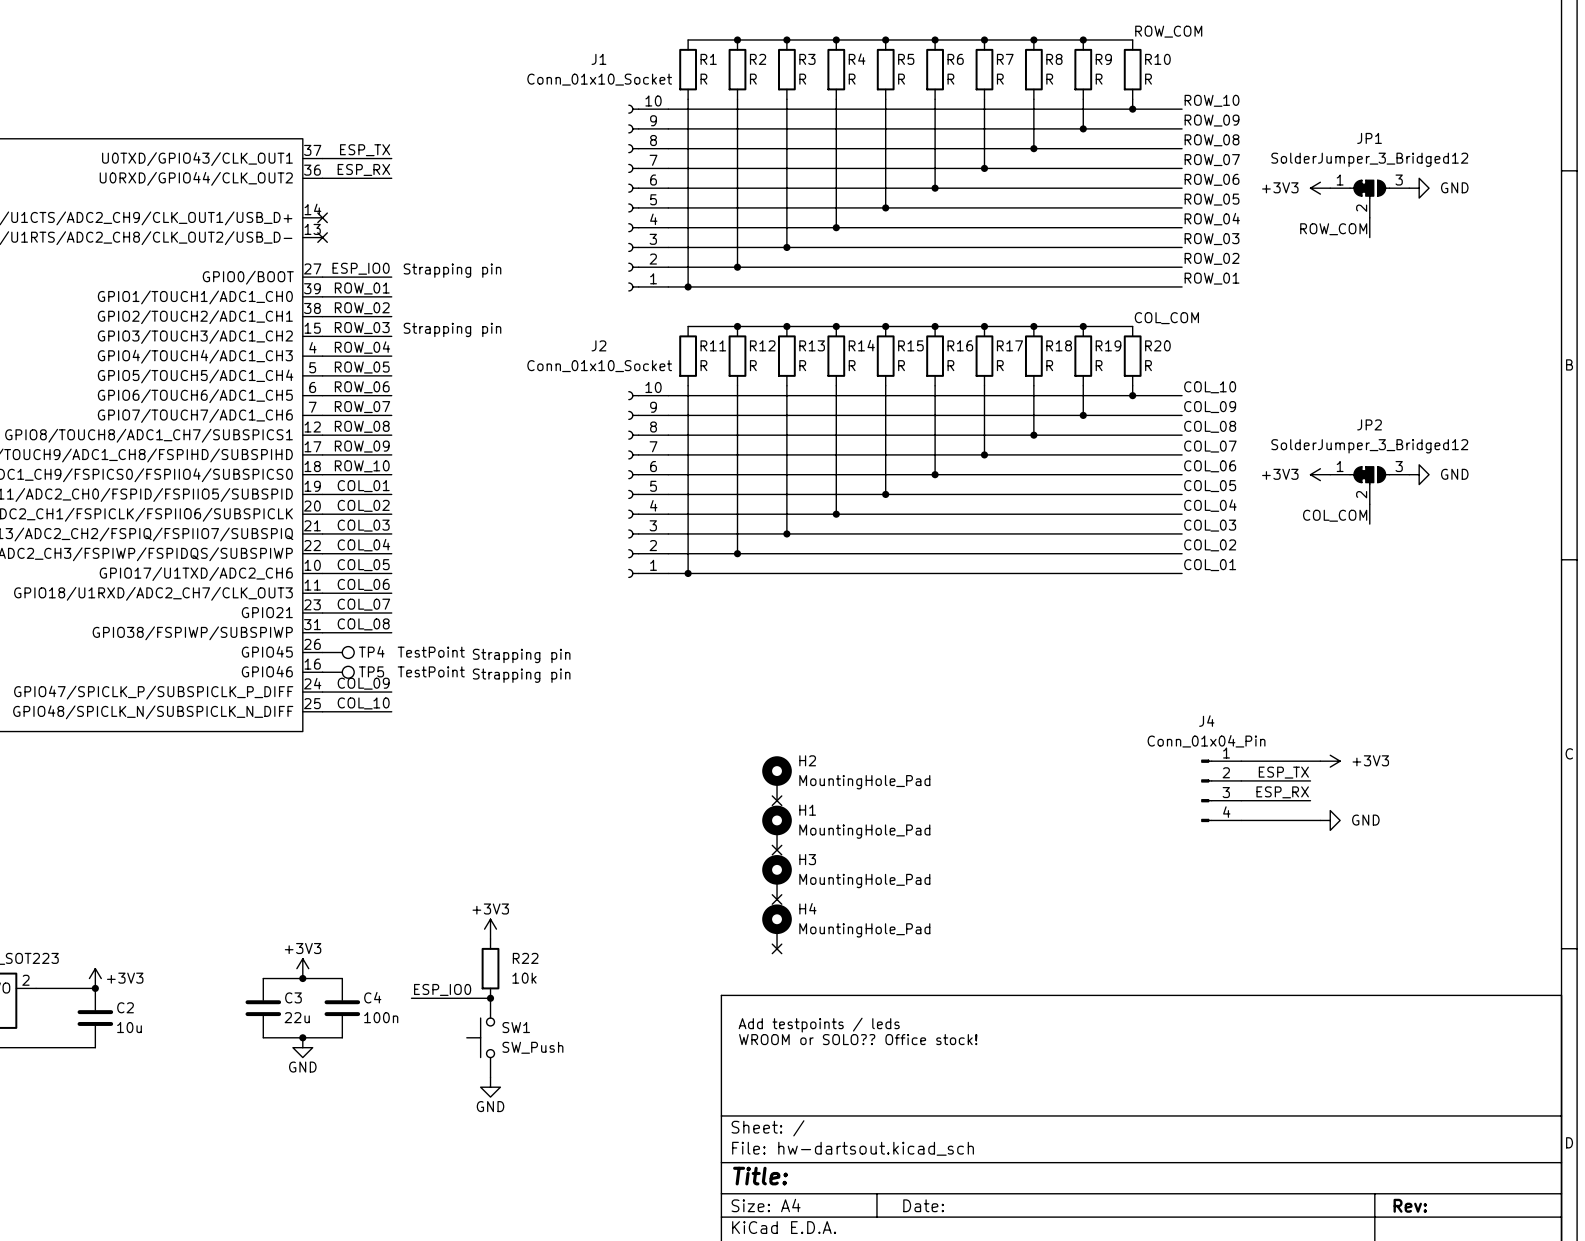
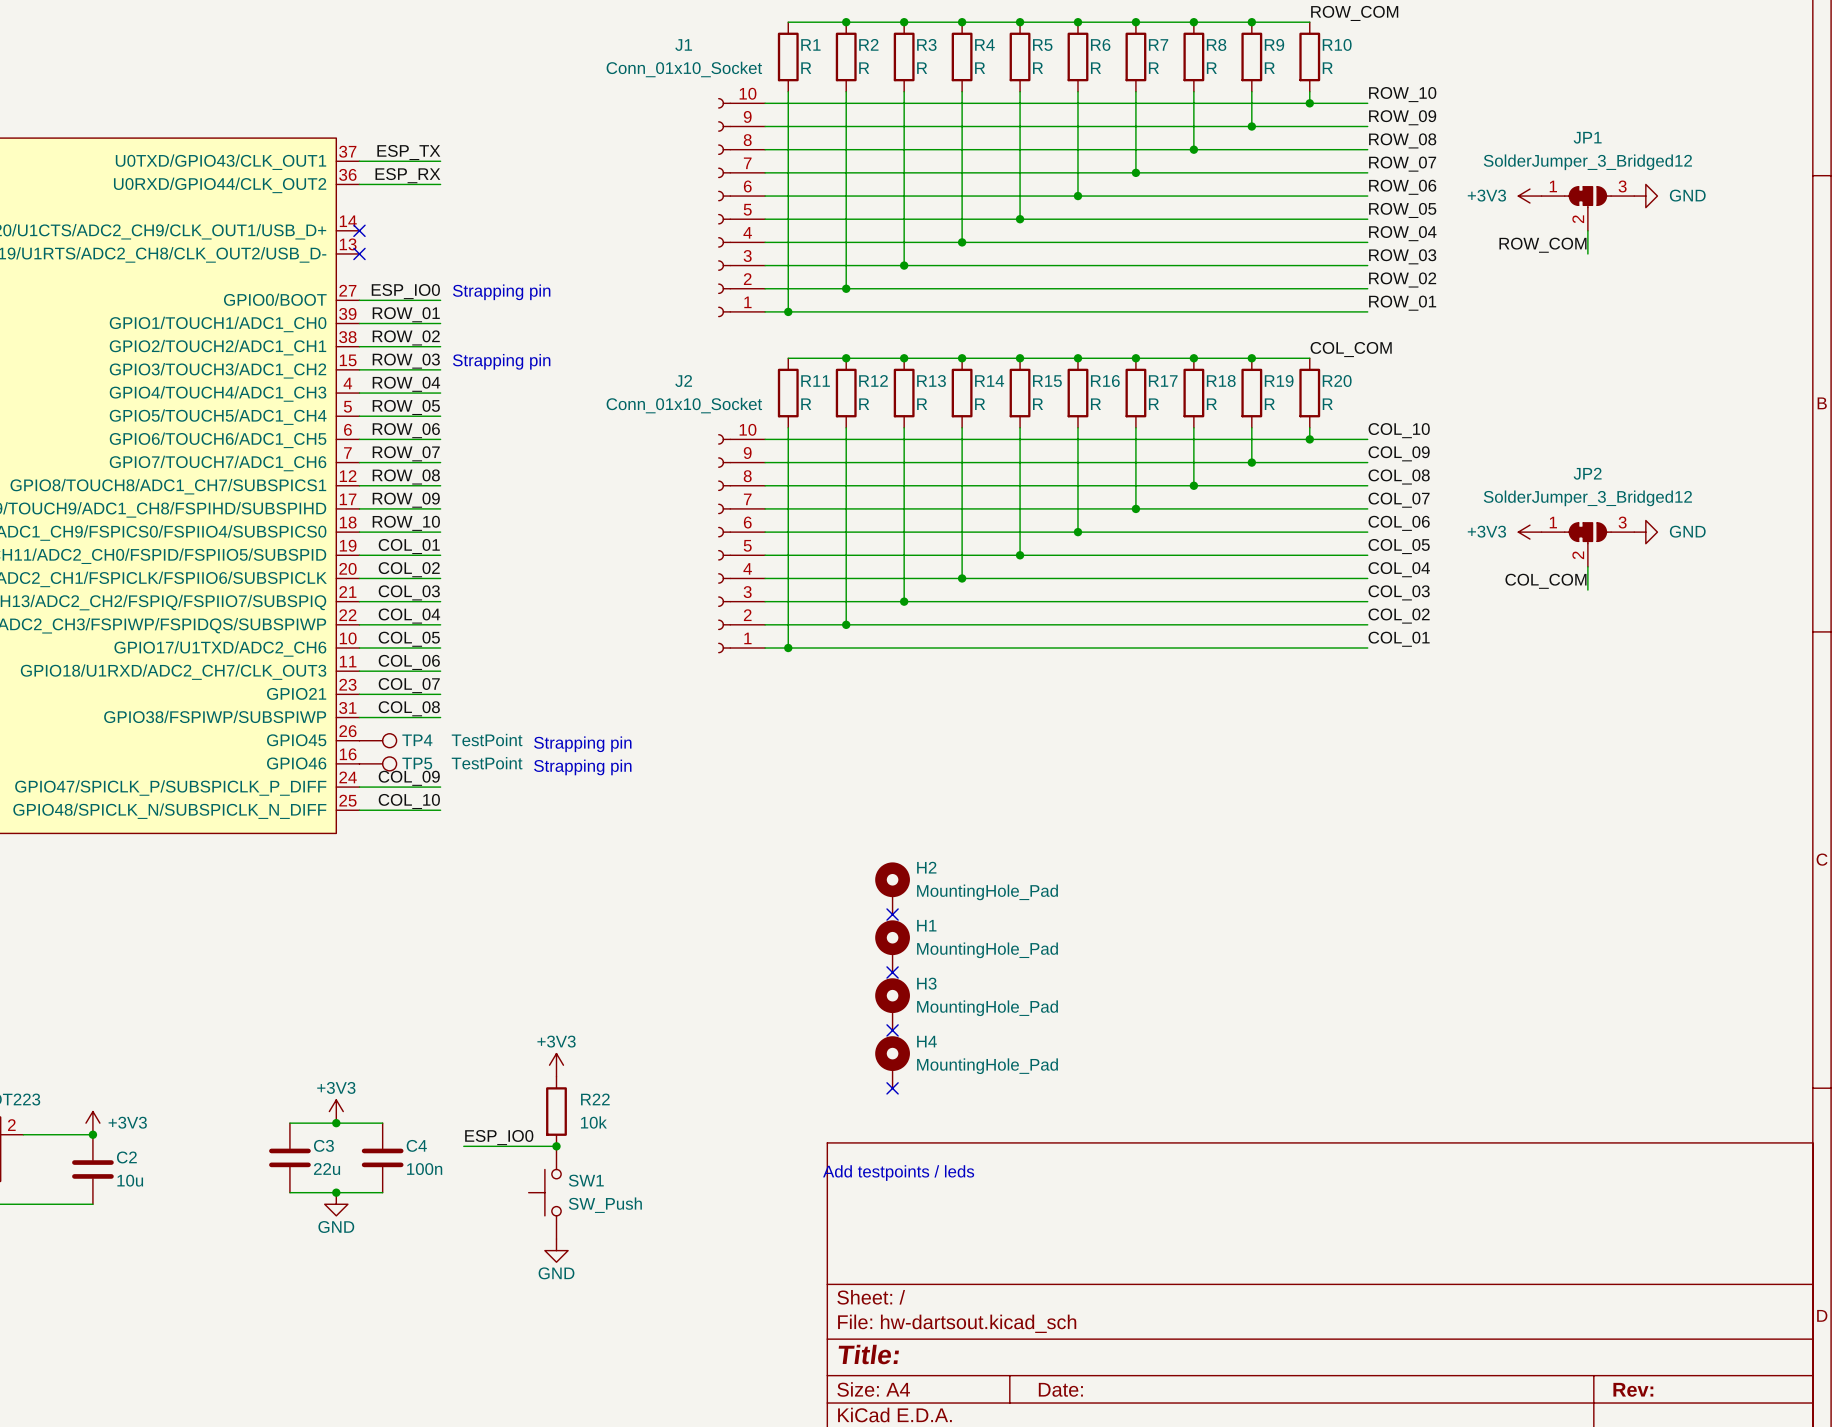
wire: (1241, 761) (1320, 761) -> none
power symbol: +3V3 (1330, 761) -> none
label: ESP_TX (1283, 772) -> none
wire: (1241, 780) (1310, 780) -> none
J4: Conn_01x04_Pin (1221, 790) -> none
label: ESP_RX (1282, 792) -> none
wire: (1241, 800) (1310, 800) -> none
wire: (1241, 820) (1320, 820) -> none
power symbol: GND (1330, 820) -> none
text position: Add testpoints / leds (819, 1025) -> Add testpoints / leds (898, 1173)
text: WROOM or SOLO?? Office stock! (858, 1039) -> none

